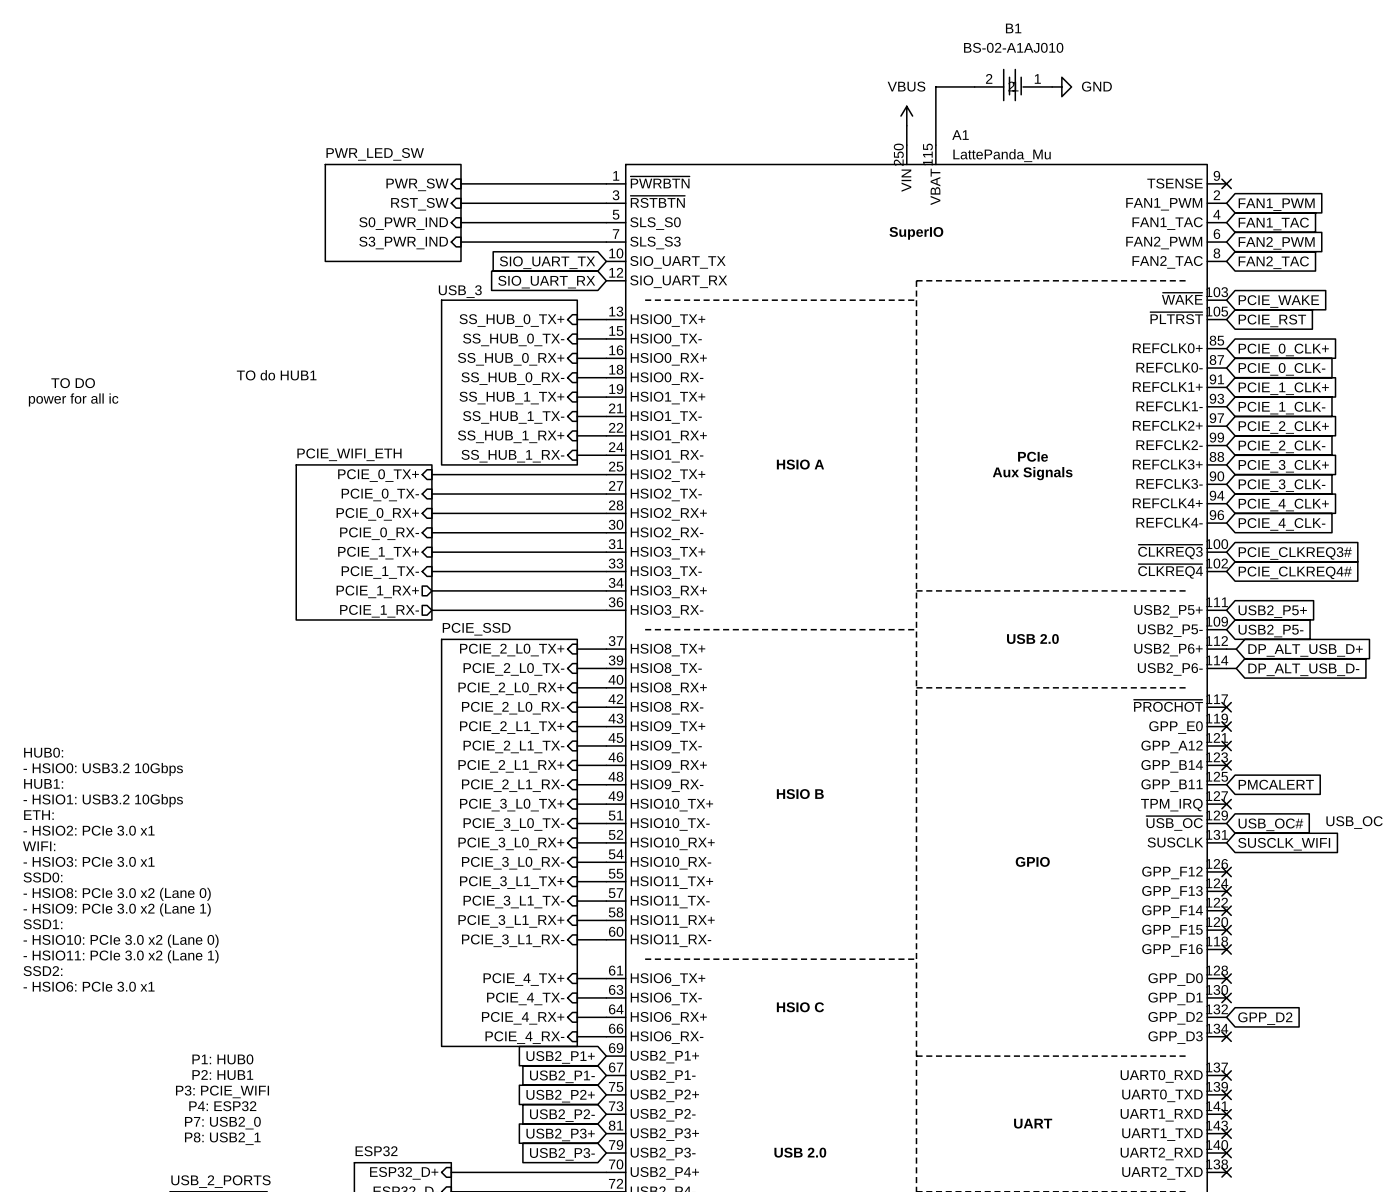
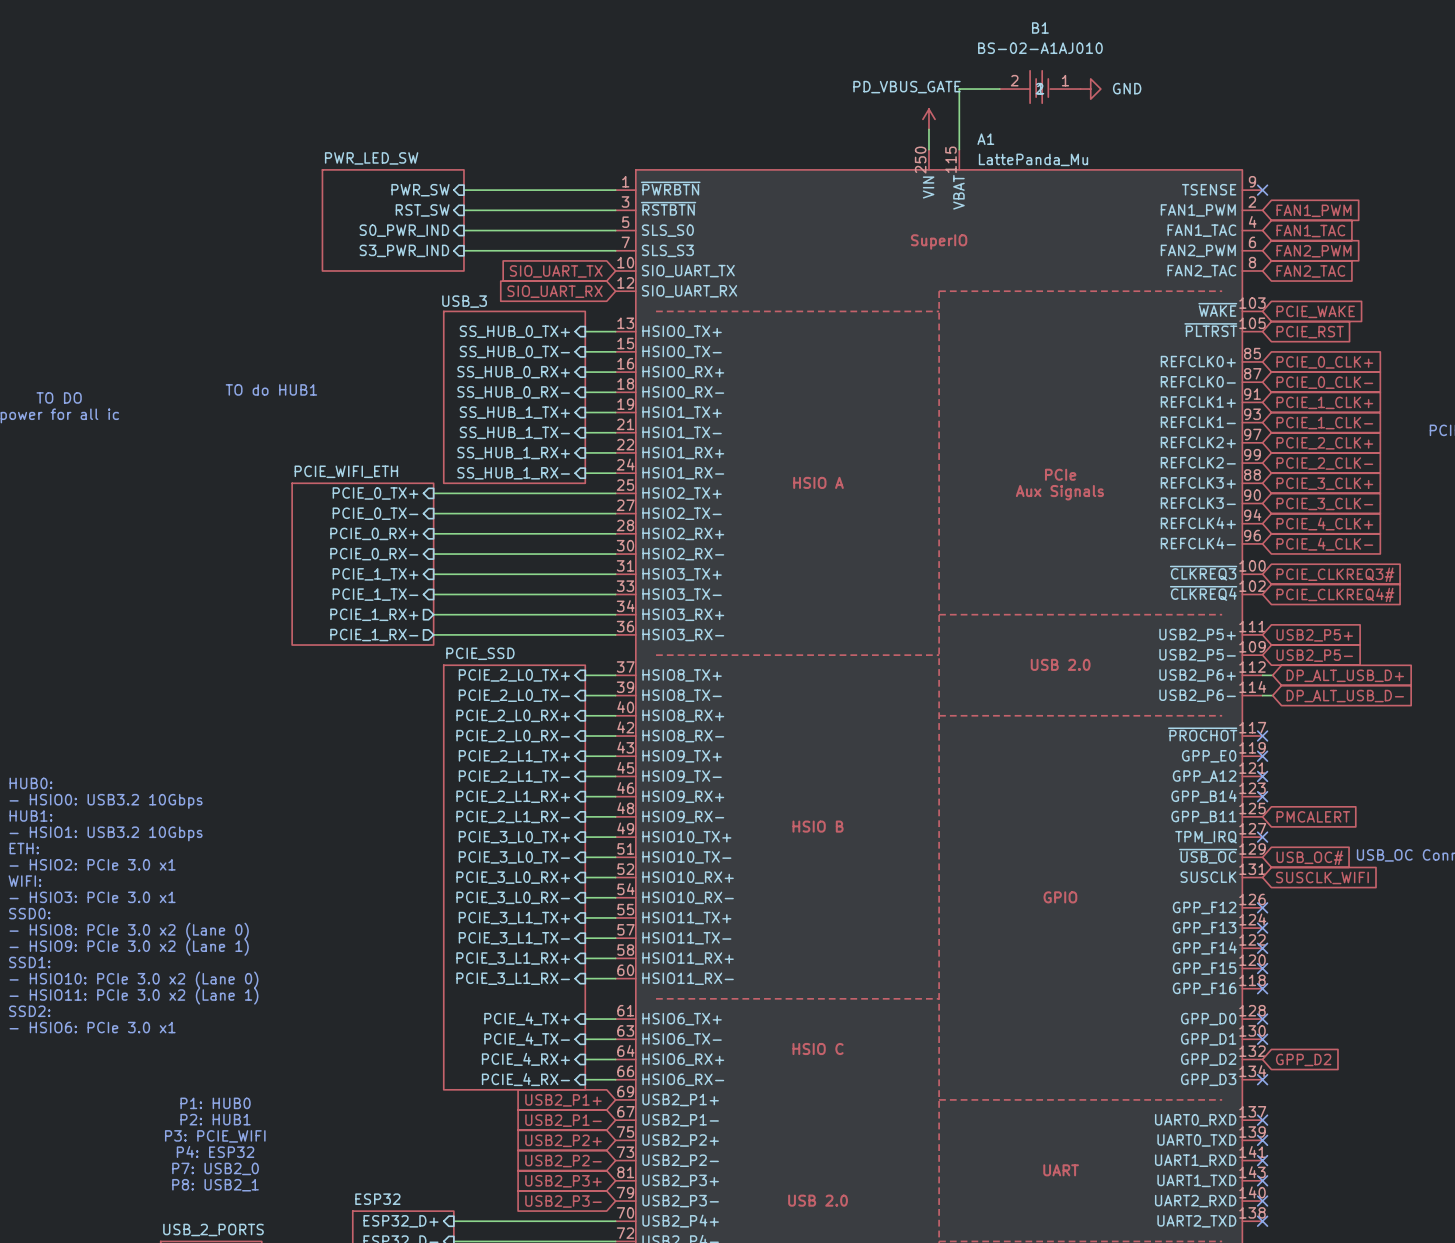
power symbol: VBUS (906, 116) -> PD_VBUS_GATE (928, 119)

